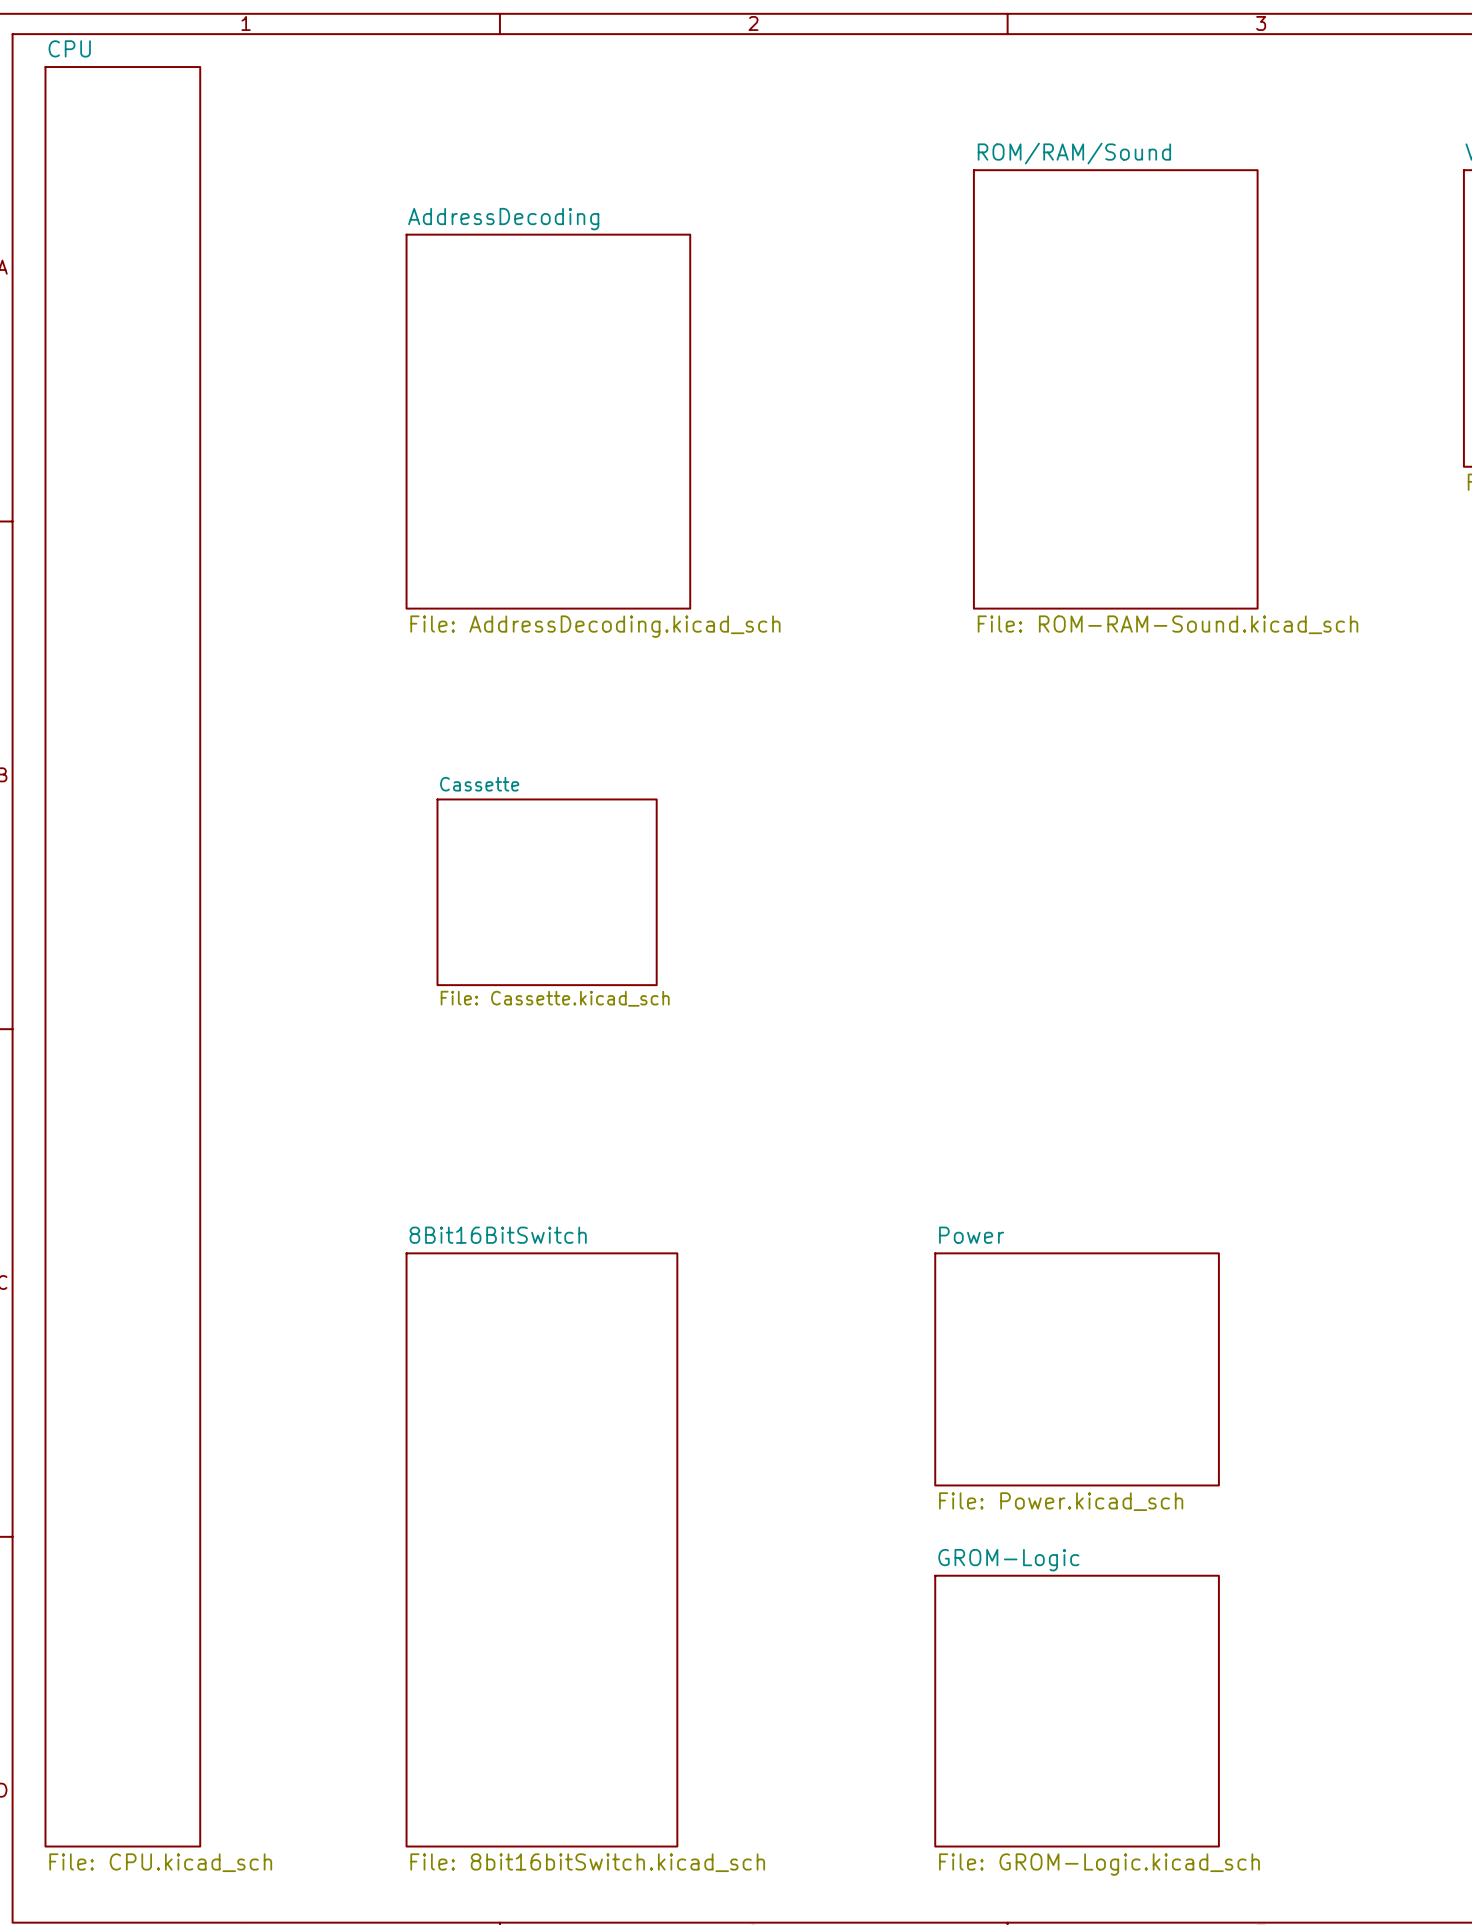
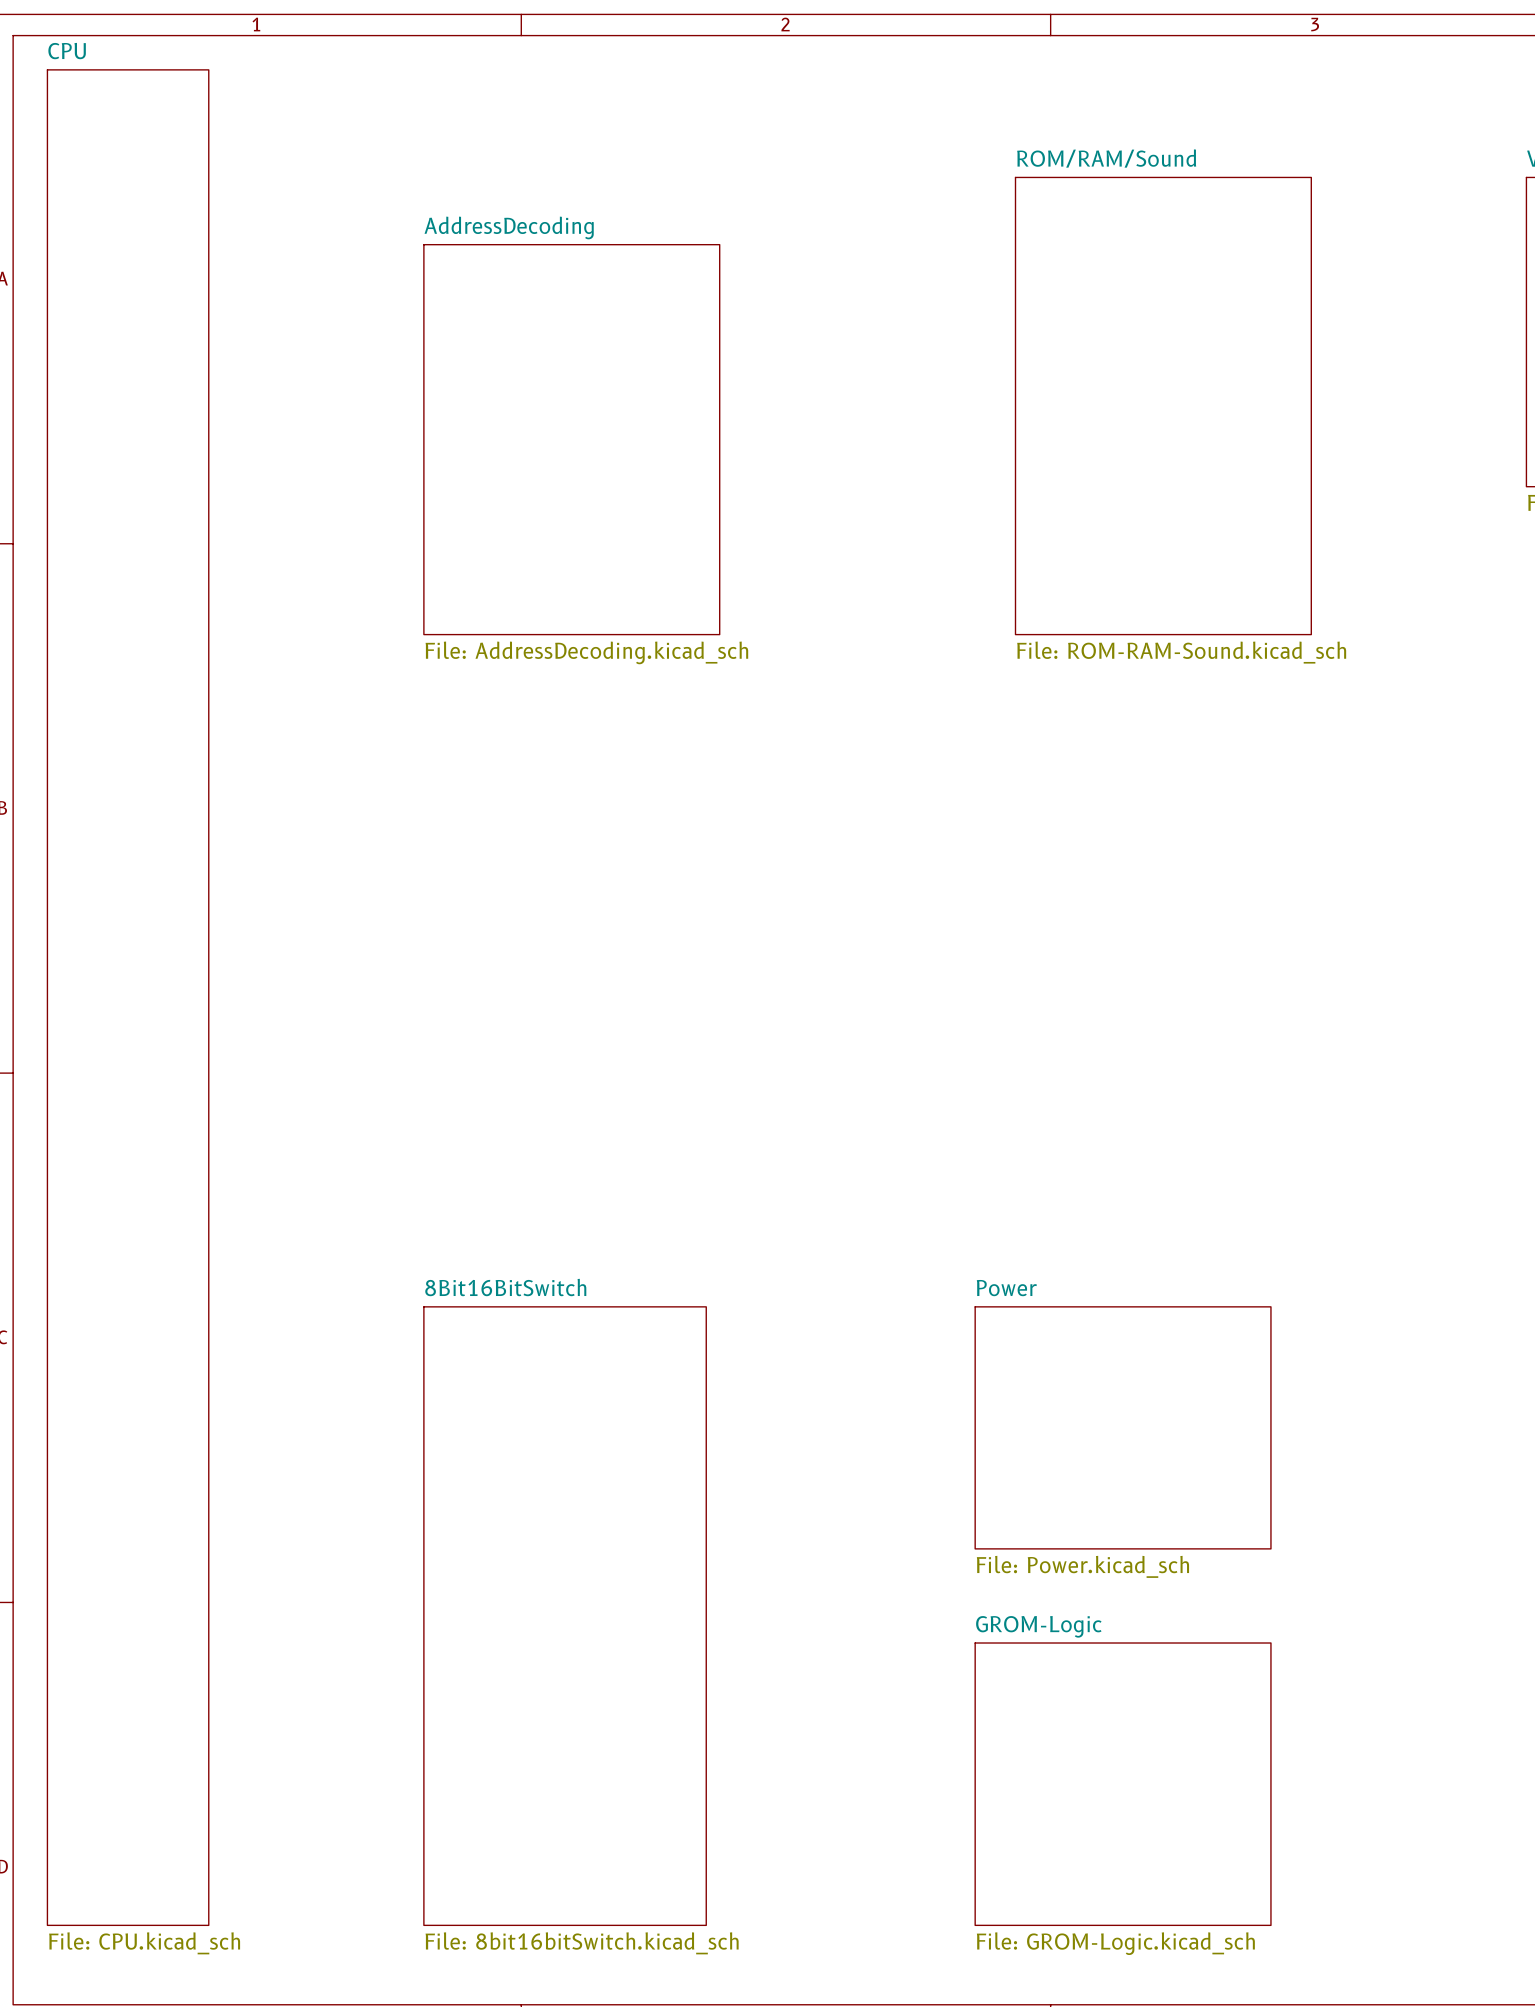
sheet Cassette: File: Cassette.kicad_sch (547, 892) -> none

